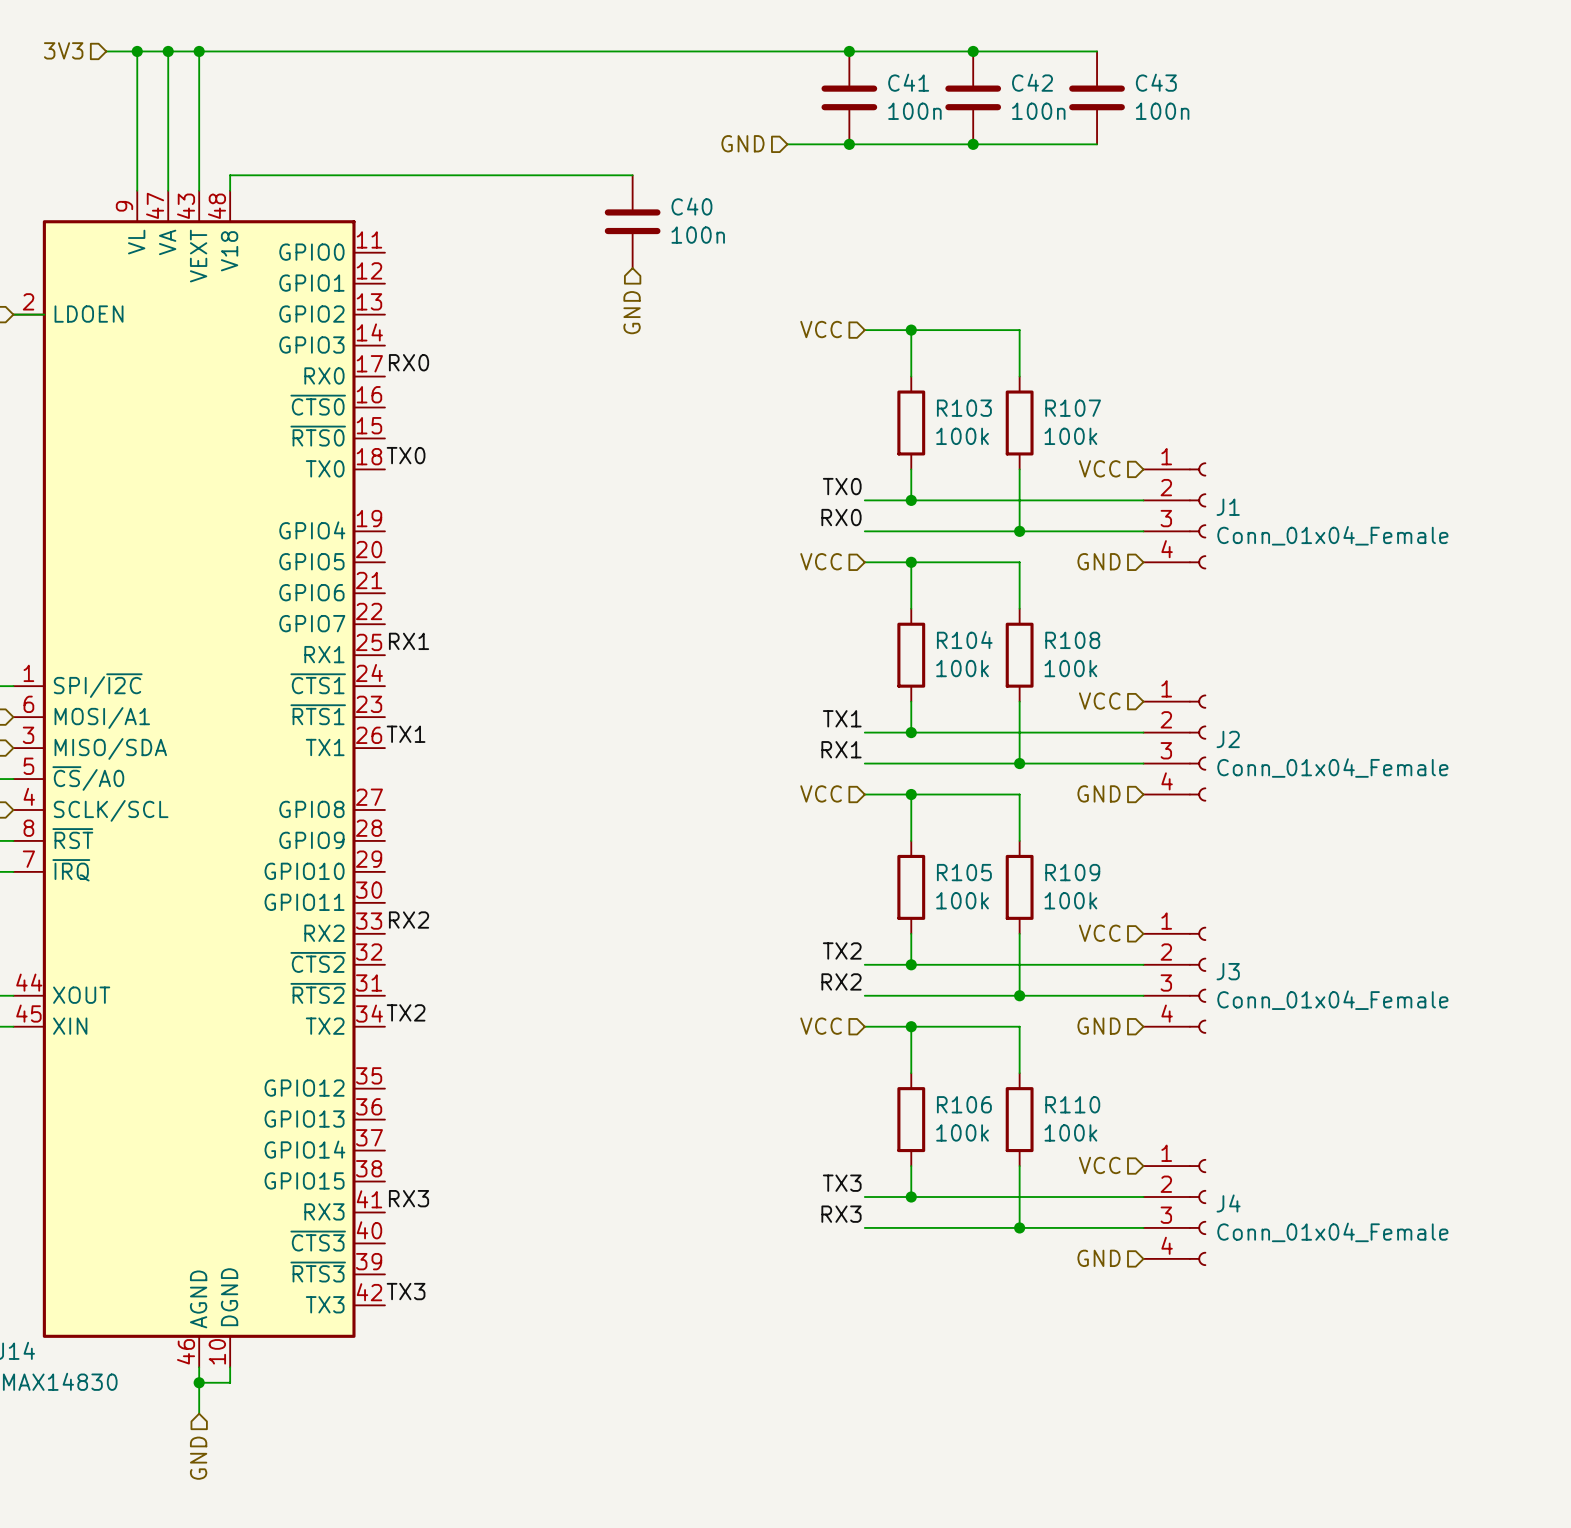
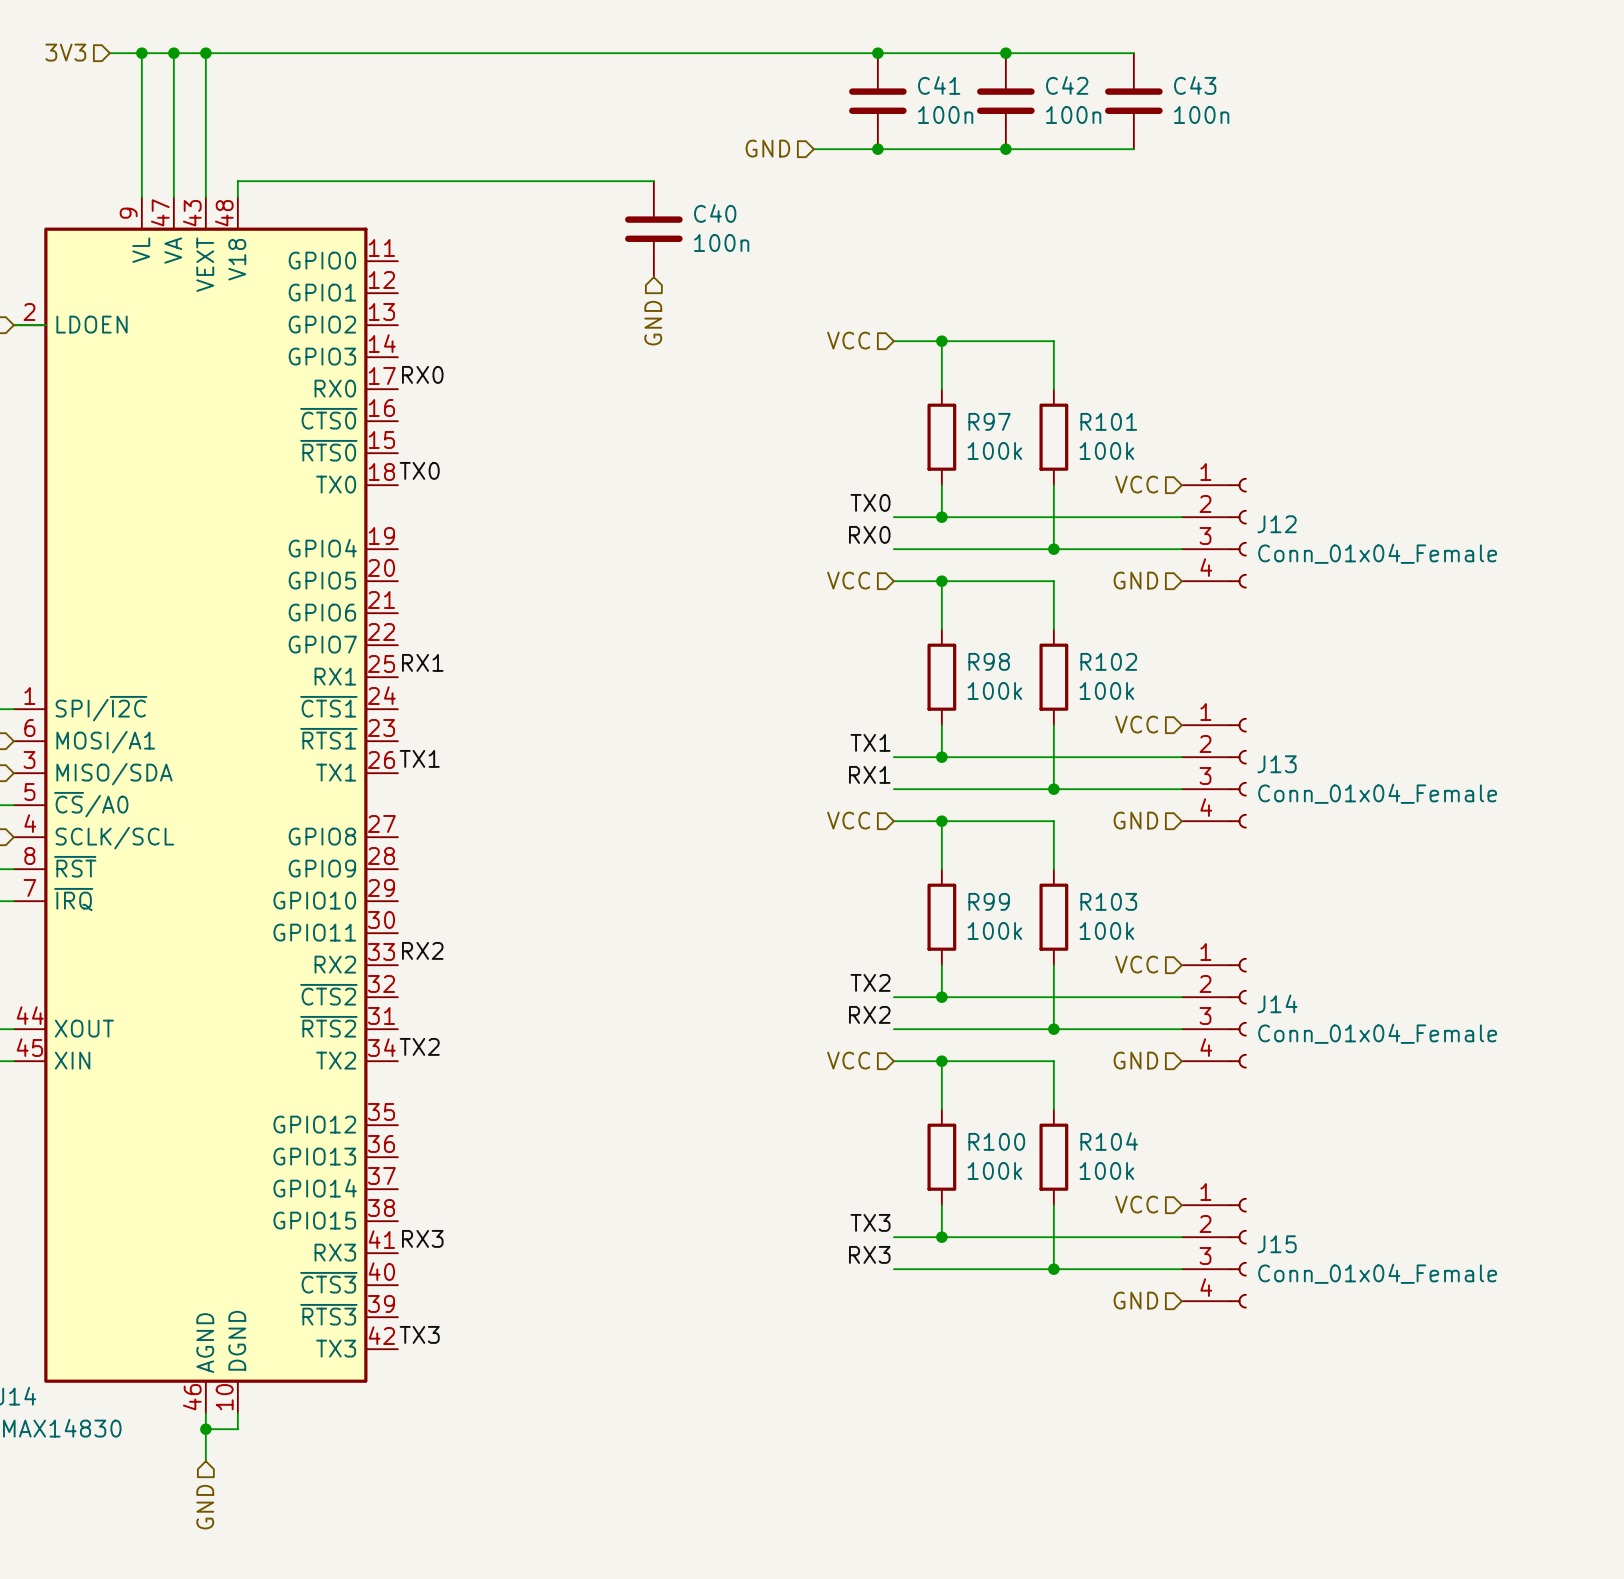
R103 name: R103 (964, 408) -> R97 (989, 421)
R107 name: R107 (1073, 408) -> R101 (1108, 421)
J1 name: J1 (1228, 507) -> J12 (1277, 524)
R104 name: R104 (964, 640) -> R98 (989, 661)
R108 name: R108 (1072, 640) -> R102 (1108, 661)
J2 name: J2 (1228, 739) -> J13 (1277, 764)
R105 name: R105 (964, 872) -> R99 (989, 901)
R109 name: R109 (1072, 872) -> R103 (1108, 901)
J3 name: J3 (1228, 971) -> J14 (1277, 1003)
R106 name: R106 (964, 1104) -> R100 (996, 1141)
R110 name: R110 (1072, 1104) -> R104 (1109, 1141)
J4 name: J4 (1228, 1203) -> J15 (1277, 1244)

